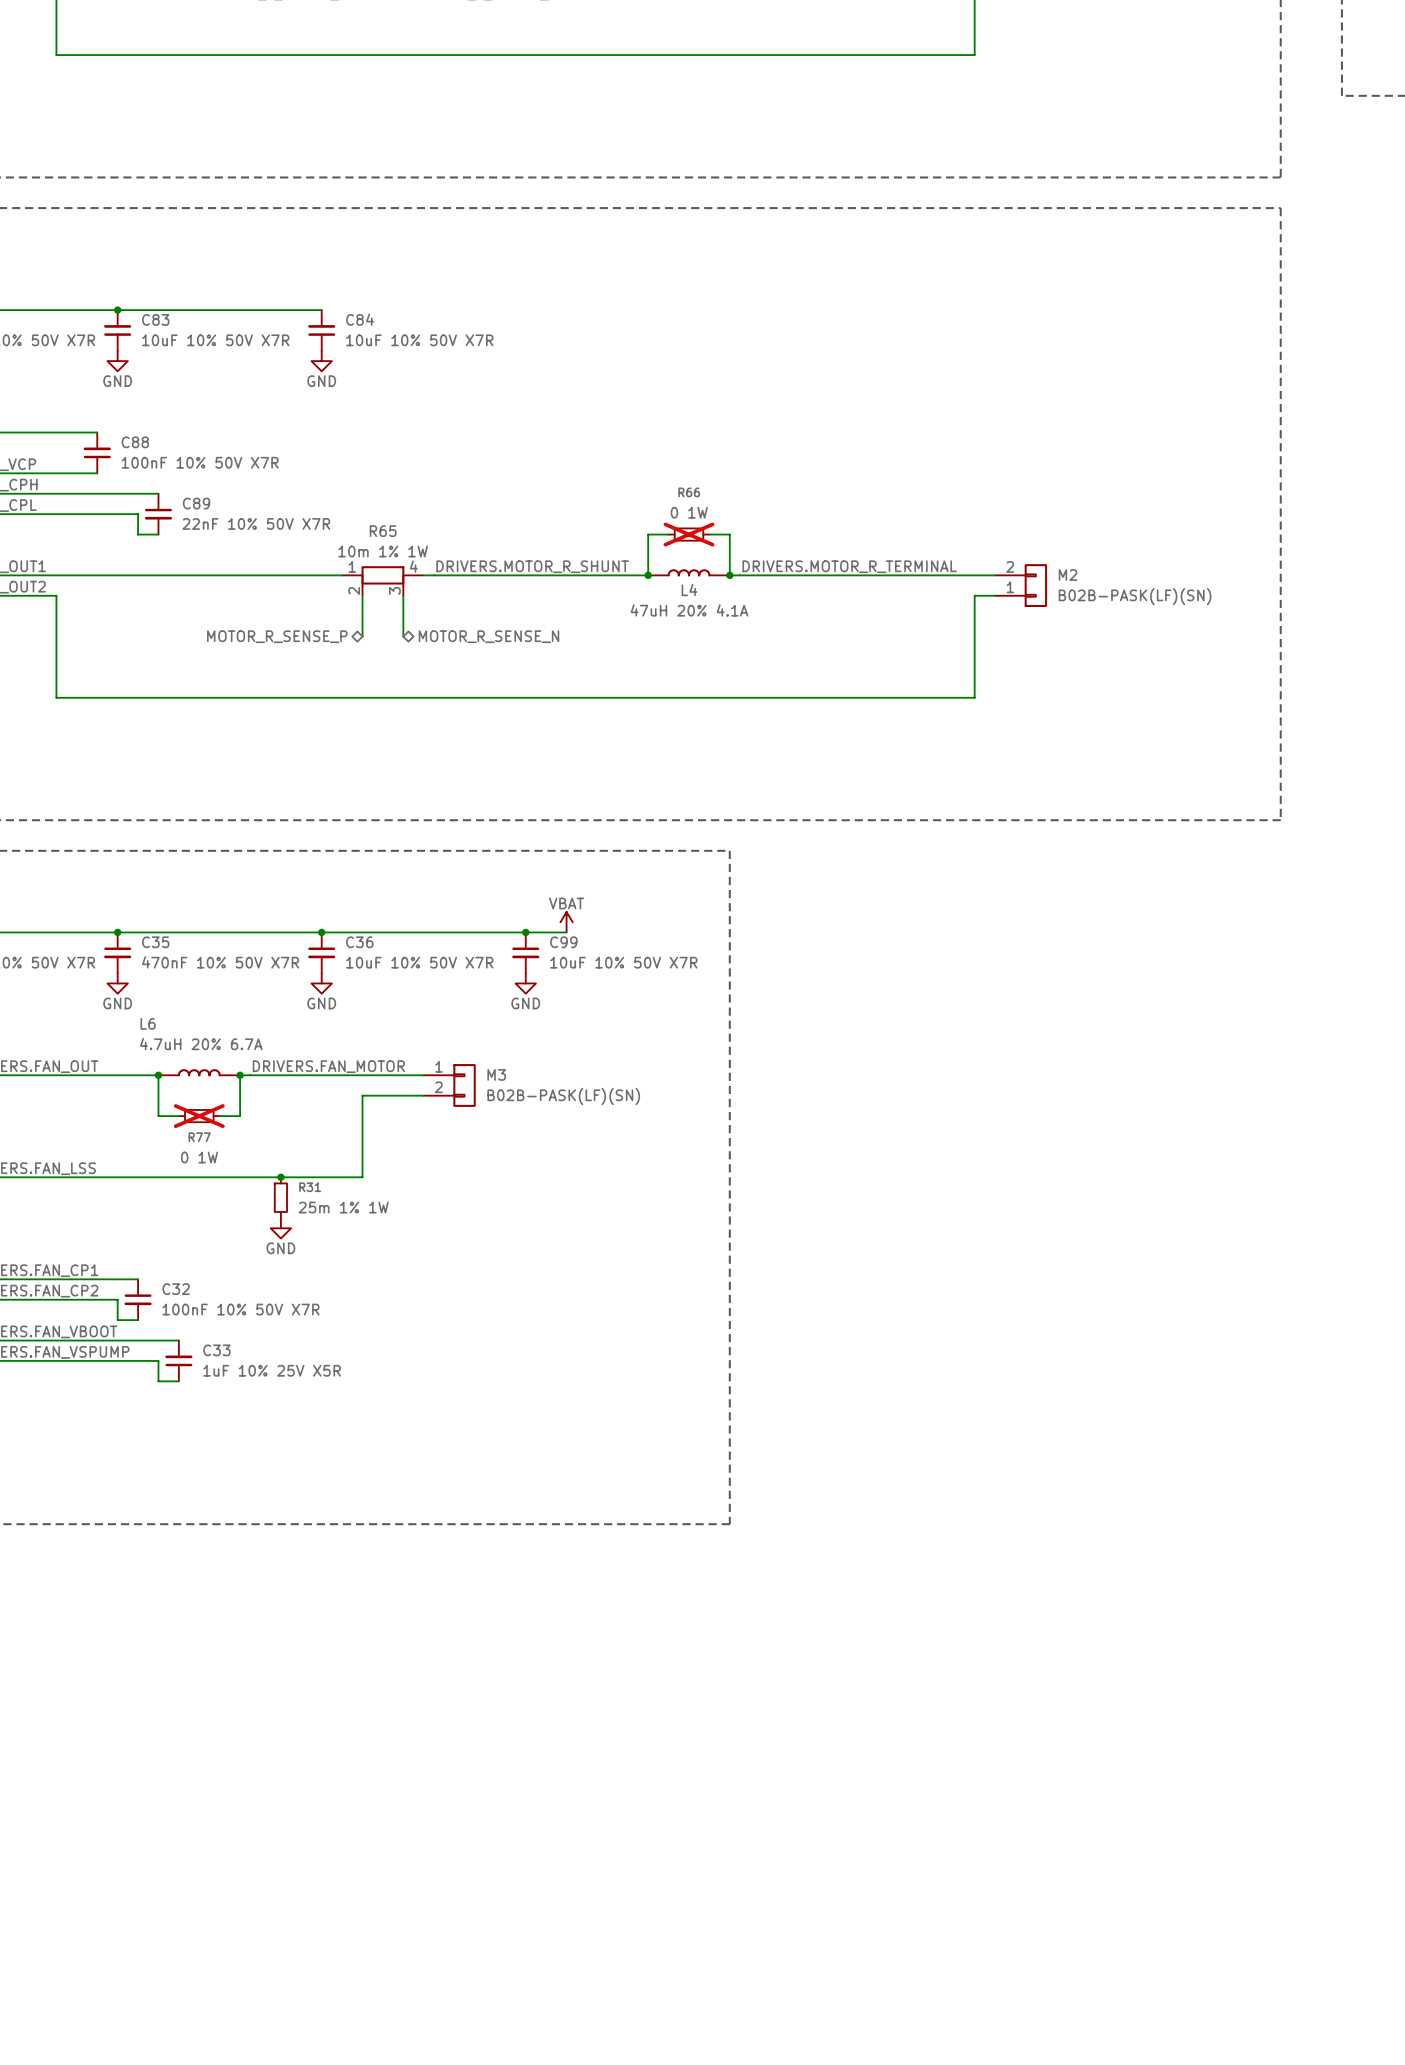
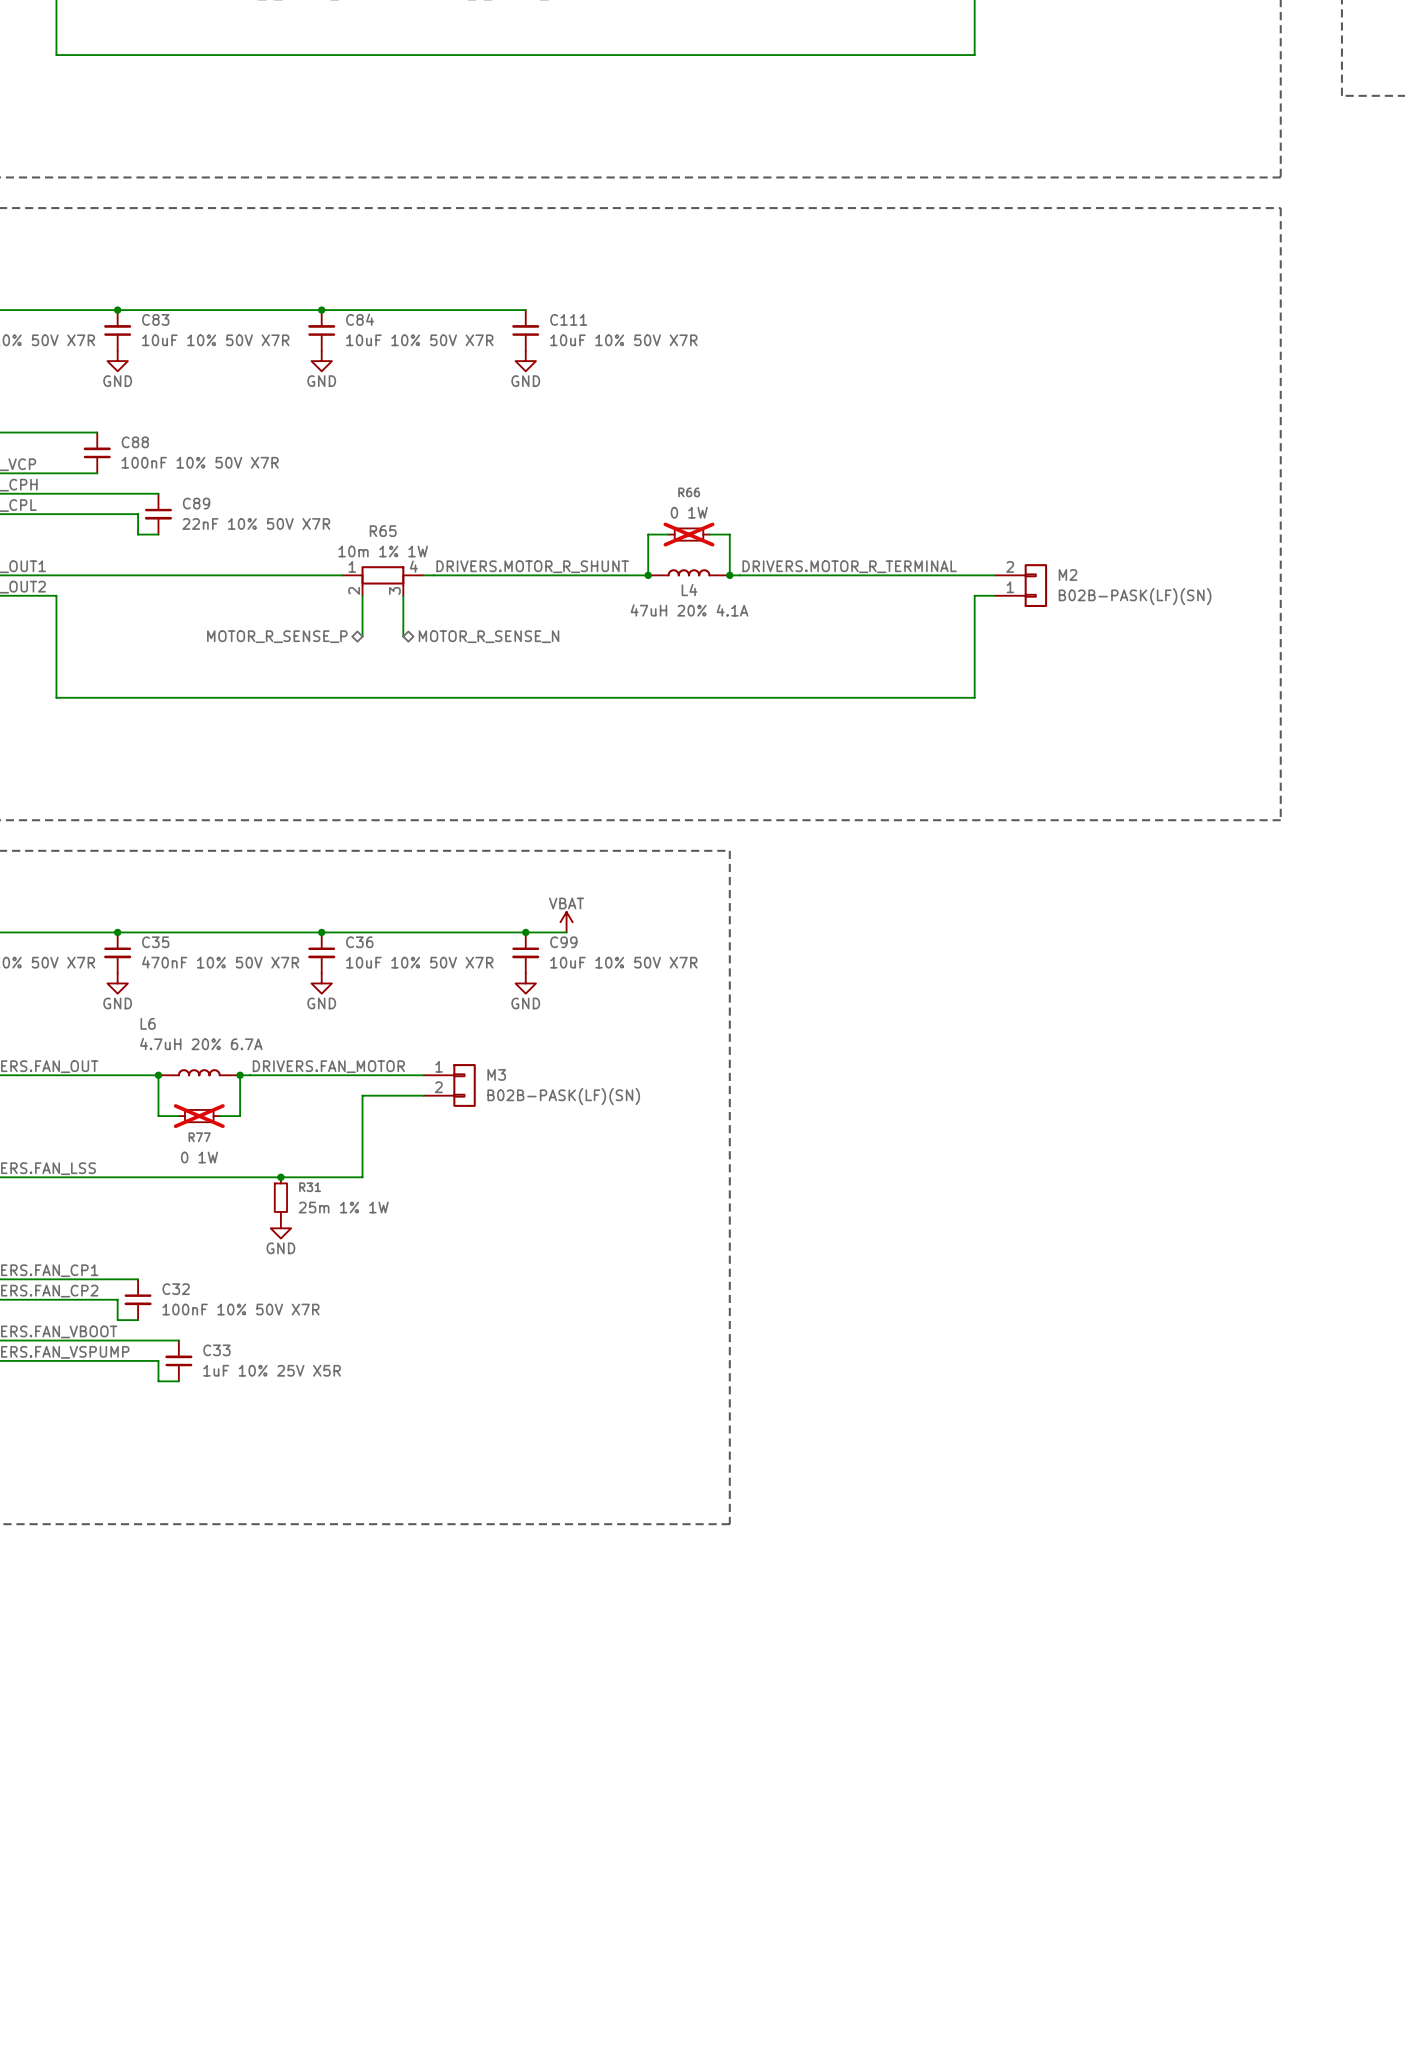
wire: none -> (321, 310) (525, 310)
junction: none -> (321, 310)
C111: none -> 10uF 10% 50V X7R (525, 330)
power symbol: none -> GND (525, 361)

